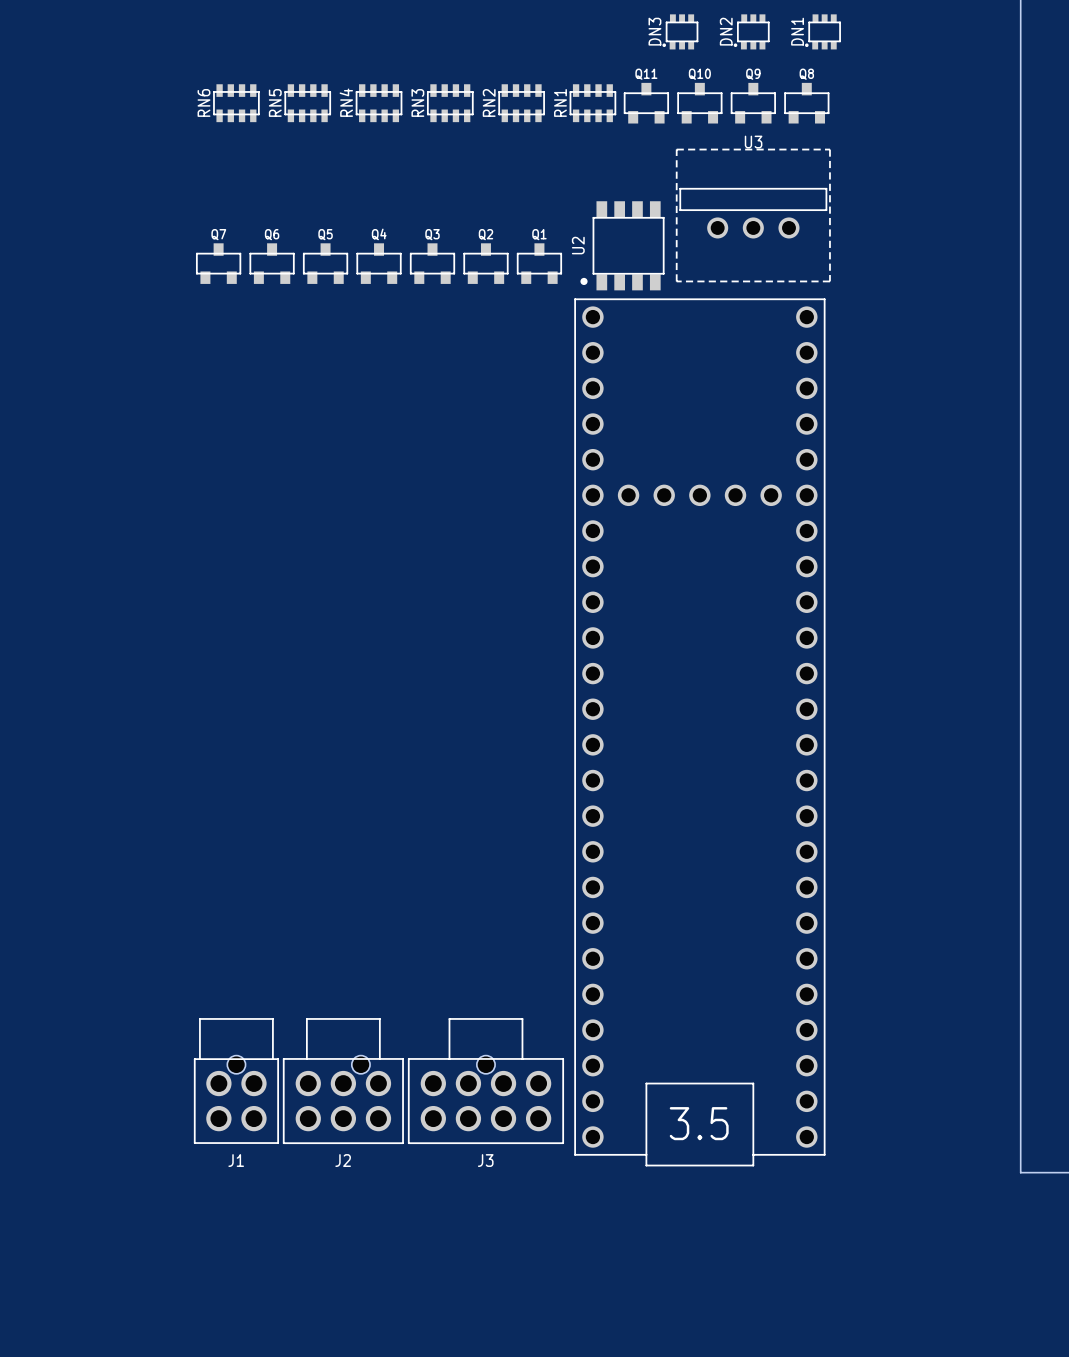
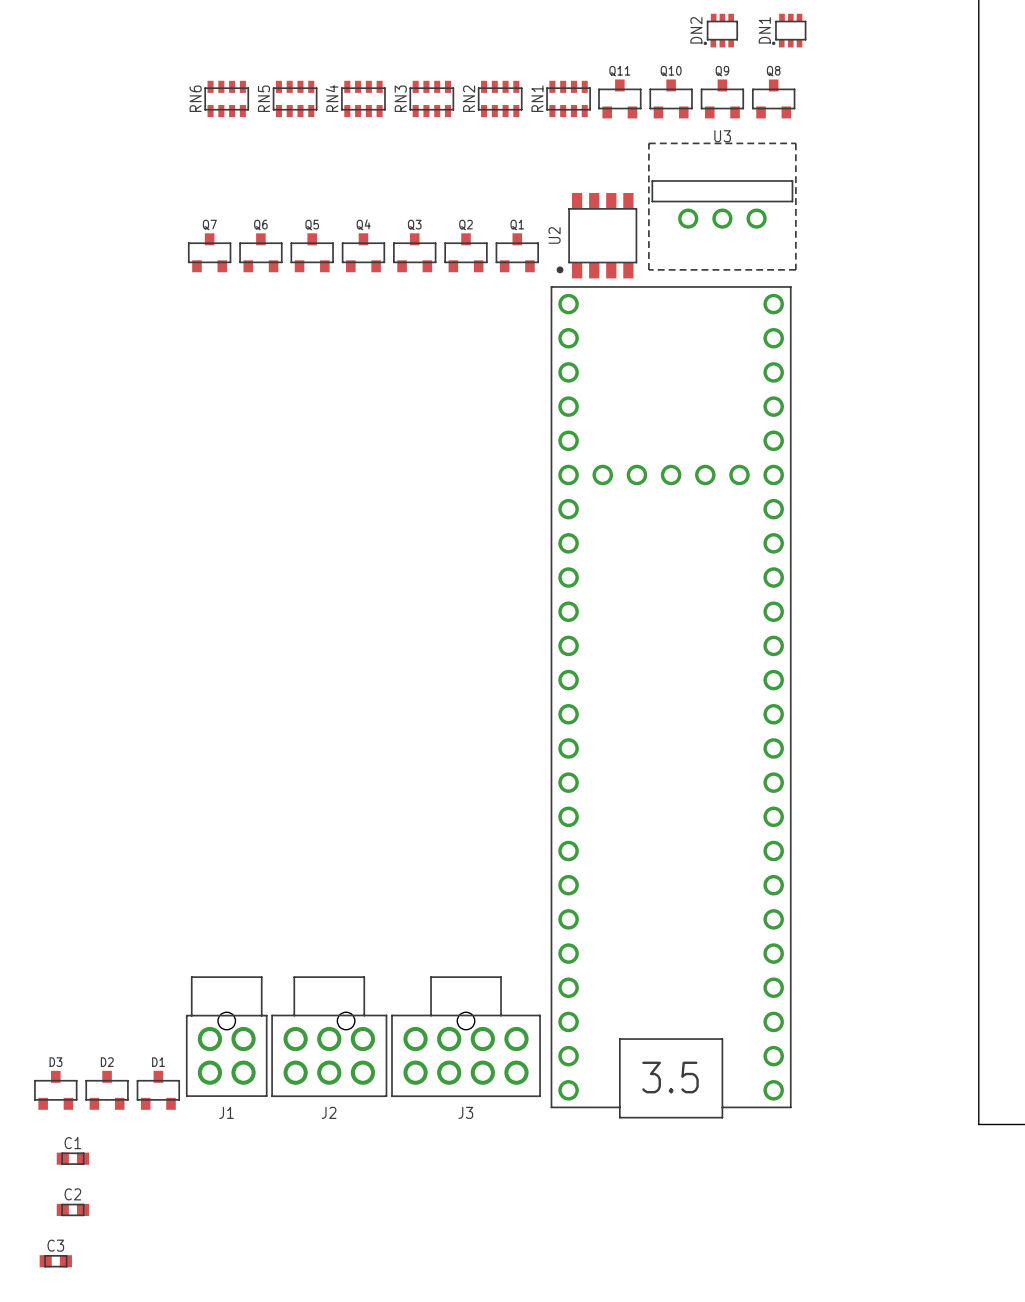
DN3: (680, 31) -> none
D3: none -> (55, 1090)
D2: none -> (107, 1090)
D1: none -> (158, 1090)
C1: none -> (72, 1158)
C2: none -> (72, 1209)
C3: none -> (55, 1261)

